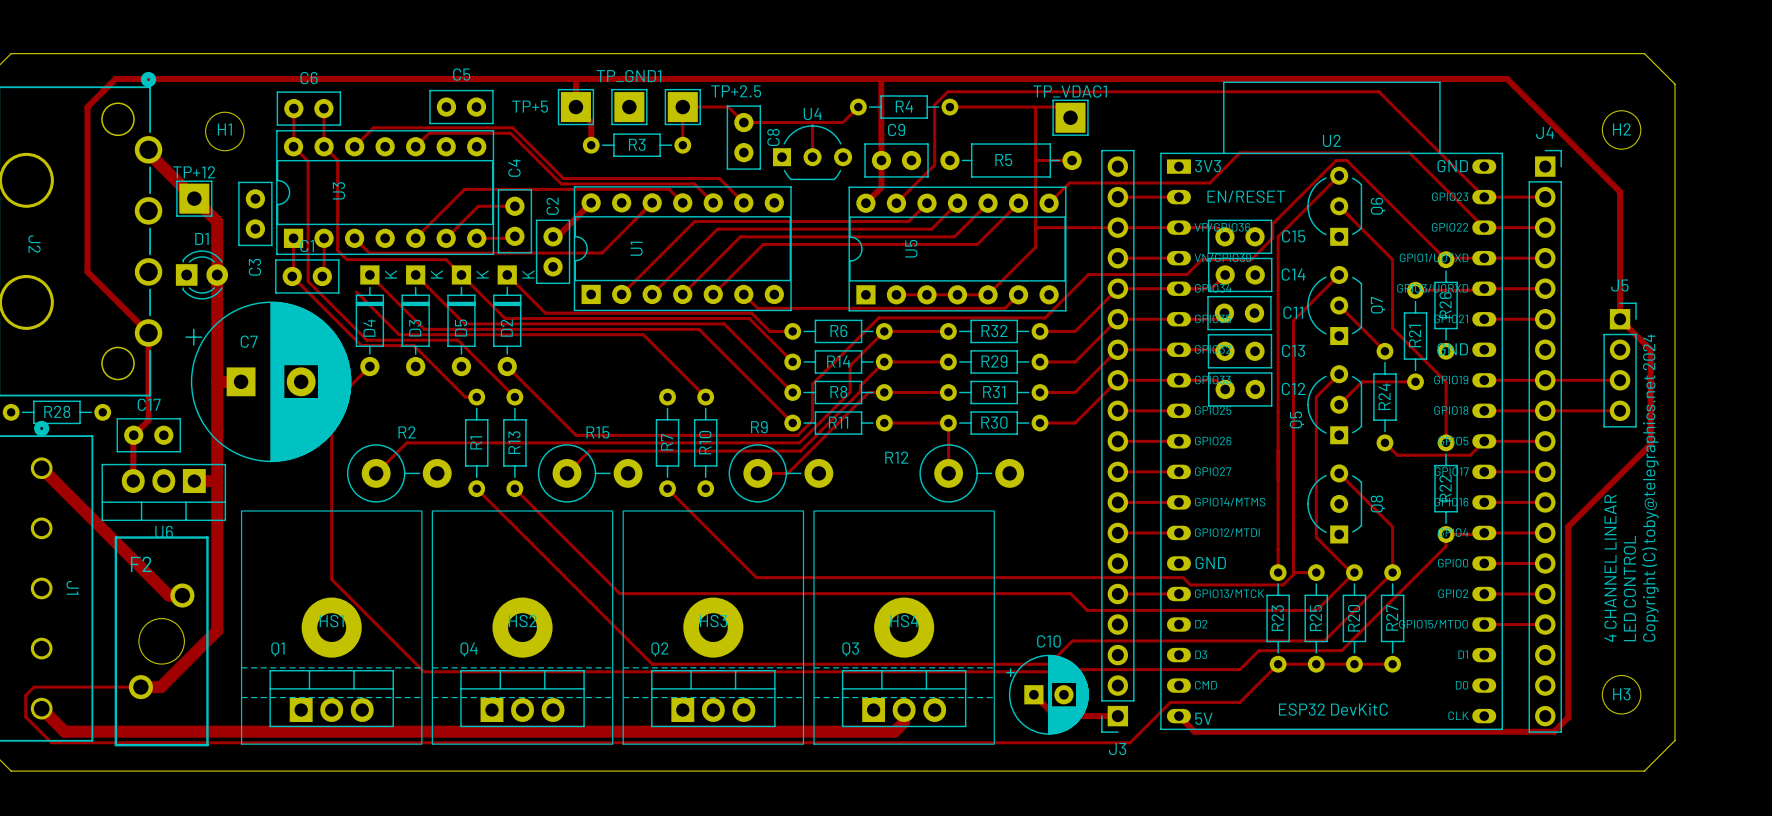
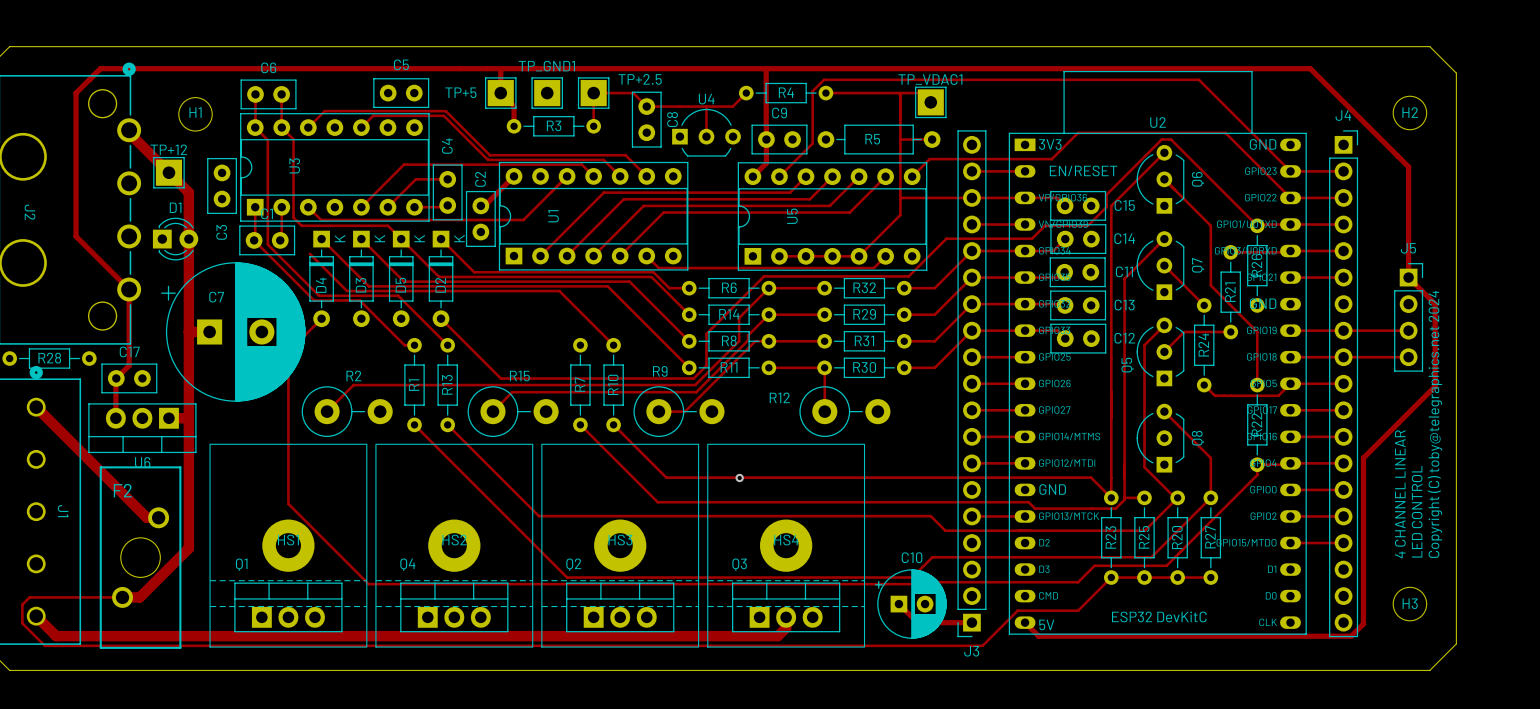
track: none -> (613, 424) (666, 477) (1091, 477) (1111, 497)
via: none -> (739, 477)

